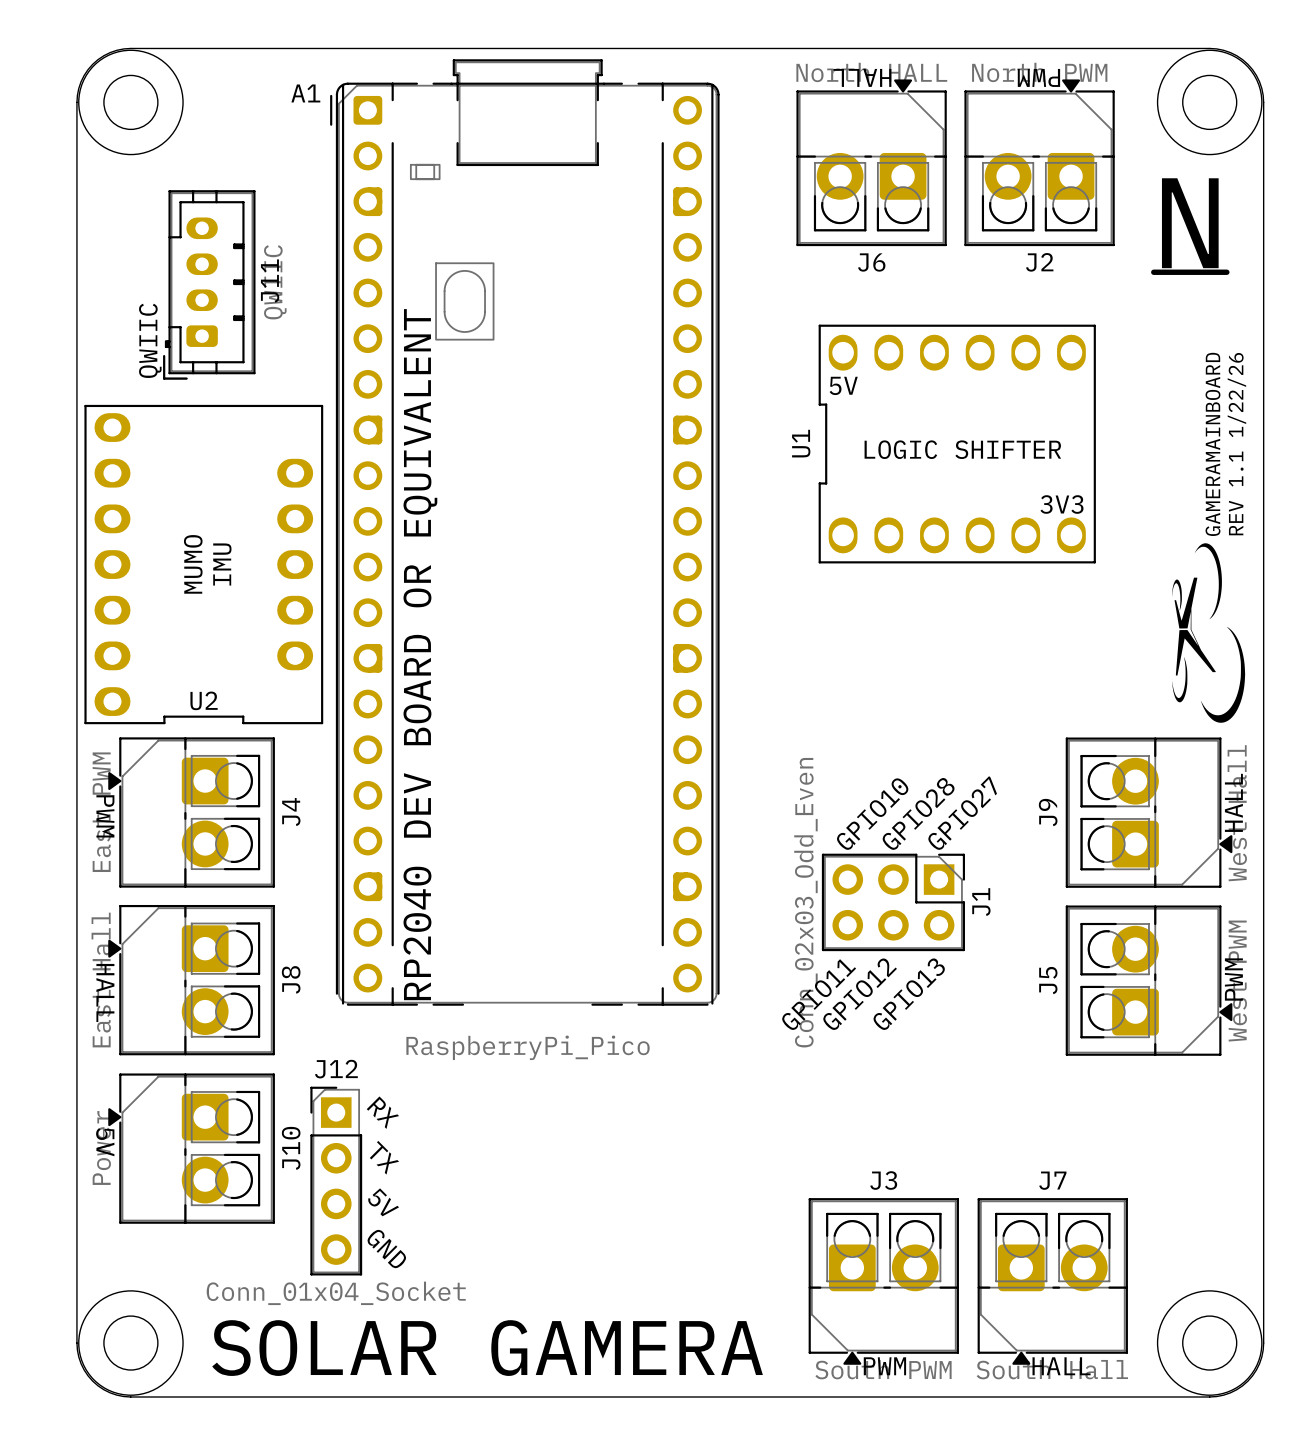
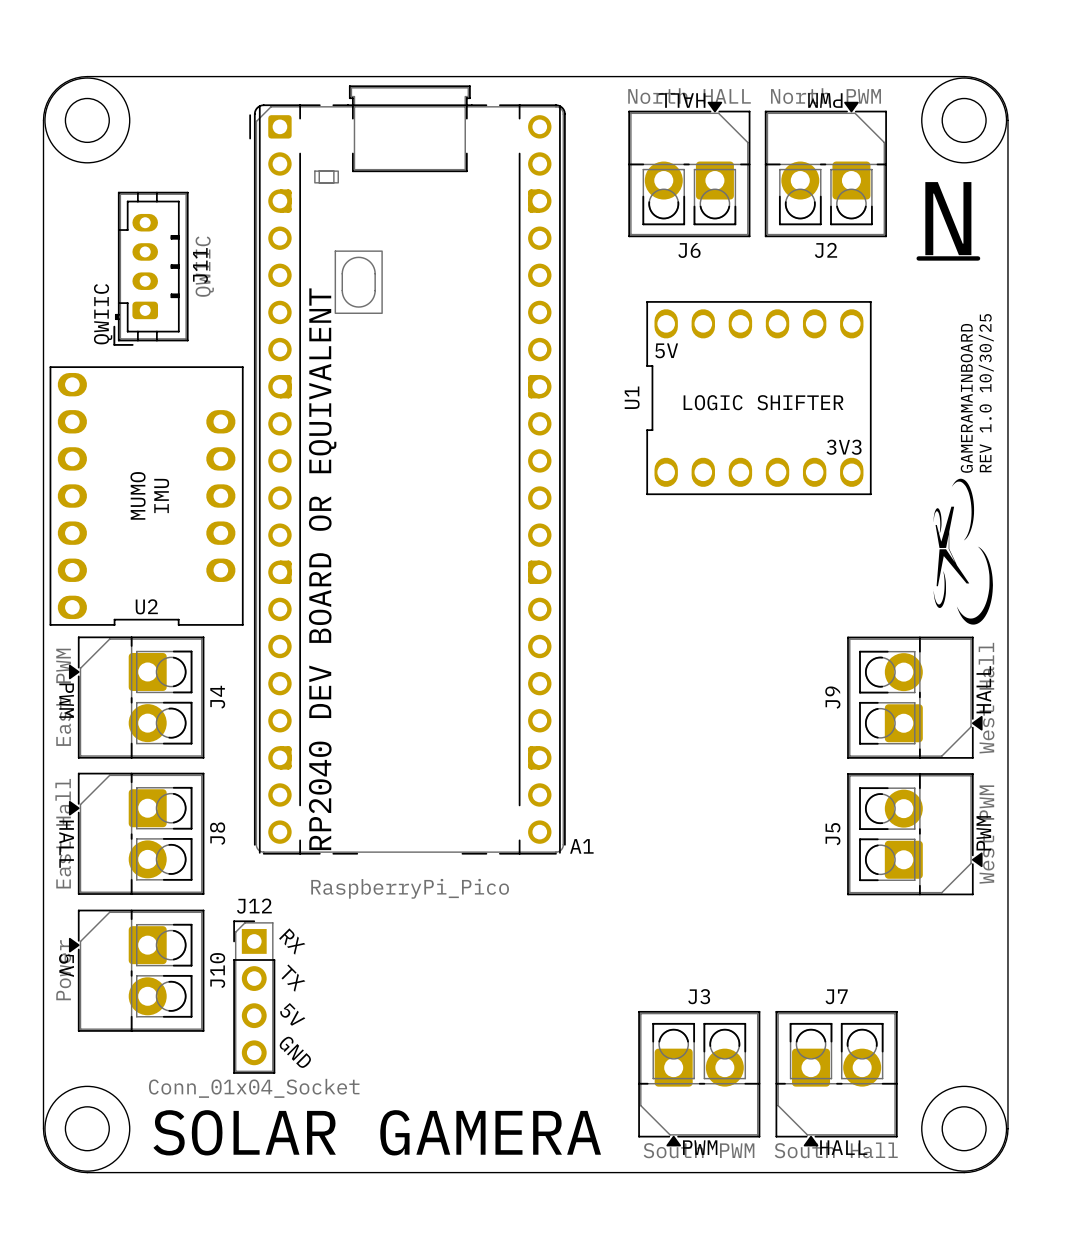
A1 name position: A1 (305, 93) -> A1 (581, 846)
text: REV 1.1 1/22/26 (1236, 444) -> REV 1.0 10/30/25 (986, 393)
text: GPIO27 (962, 813) -> none
text: GPIO10 (872, 814) -> none
text: GPIO28 (918, 814) -> none
J1: Conn_02x03_Odd_Even (893, 902) -> none
text: GPIO11 (818, 994) -> none
text: GPIO12 (859, 994) -> none
text: GPIO13 (908, 994) -> none

